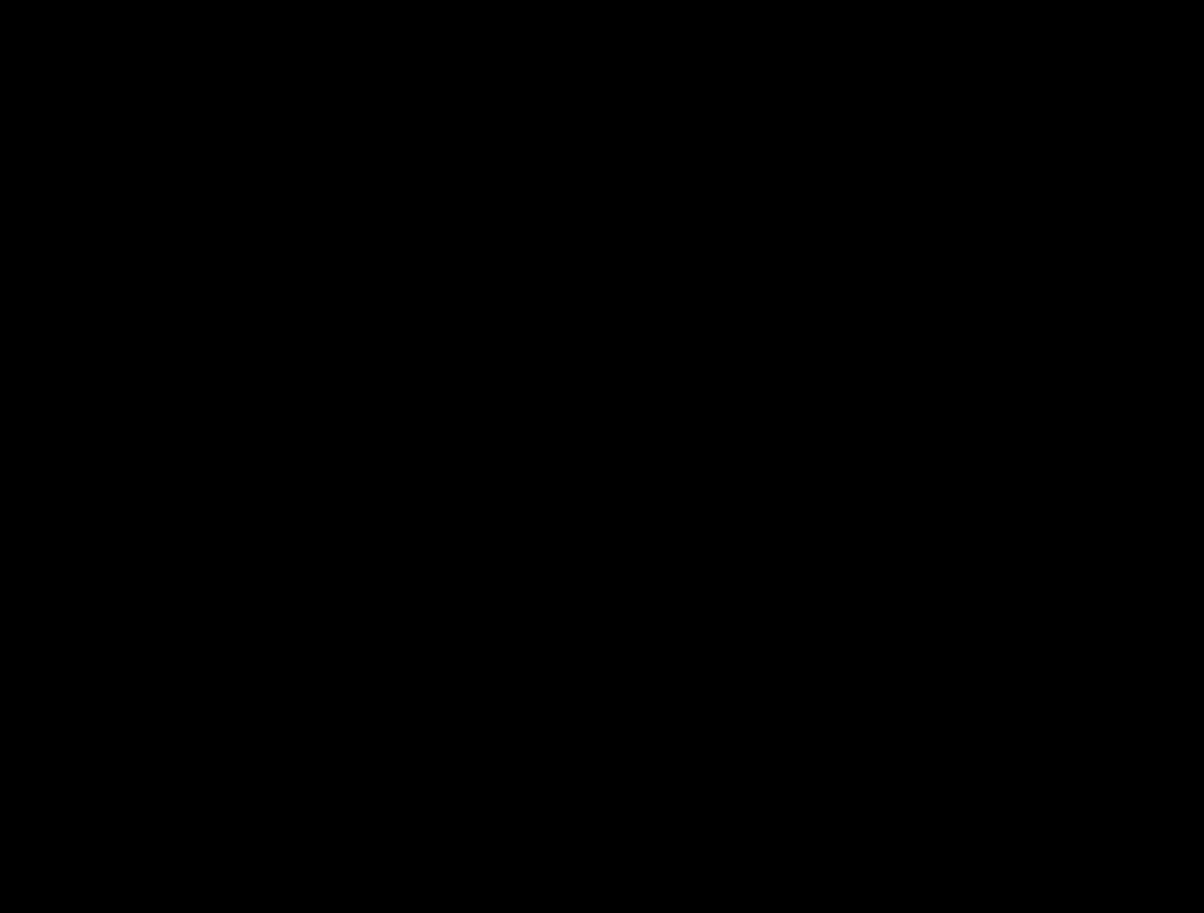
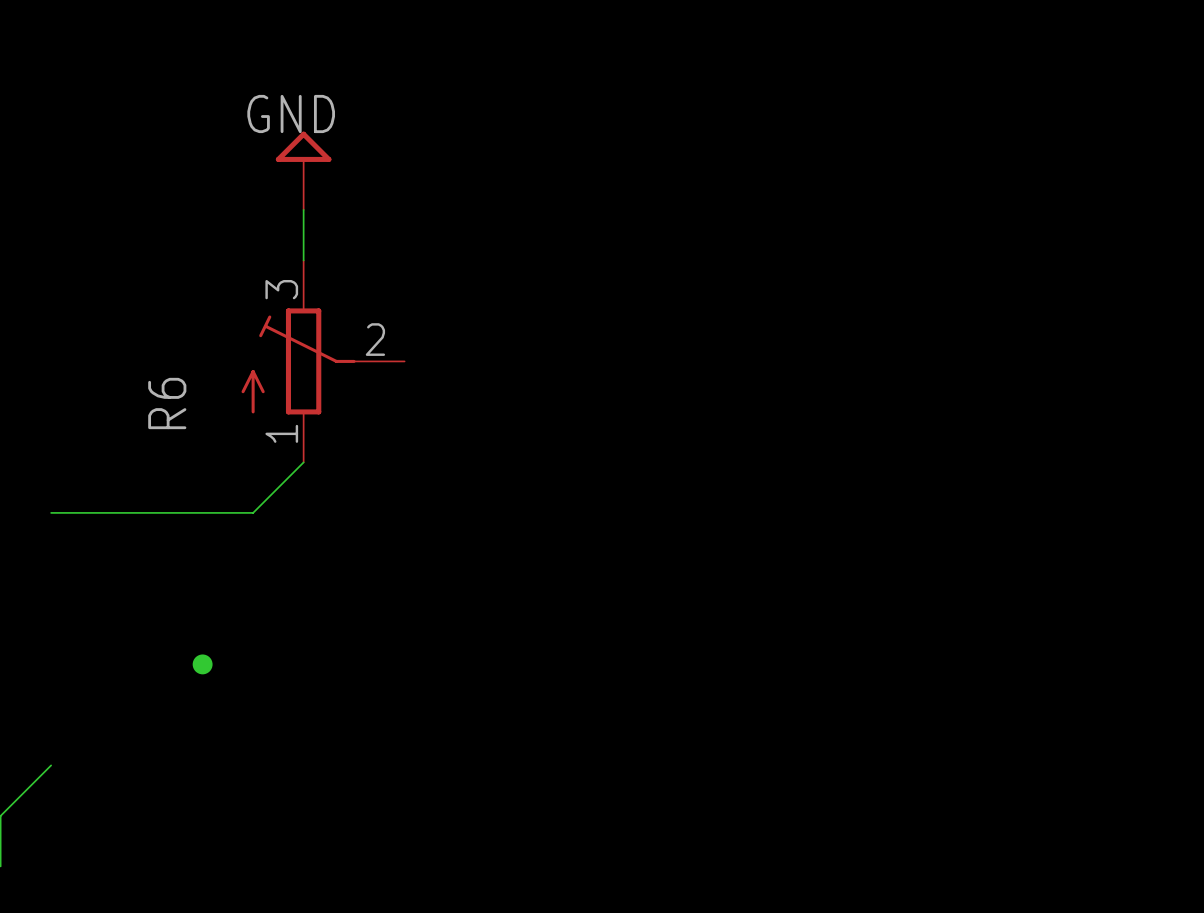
power symbol: none -> GND (303, 170)
wire: none -> (303, 209) (303, 260)
R6: none -> (323, 361)
wire: none -> (303, 462) (253, 512) (51, 512)
junction: none -> (202, 664)
wire: none -> (51, 765) (0, 815) (0, 866)

